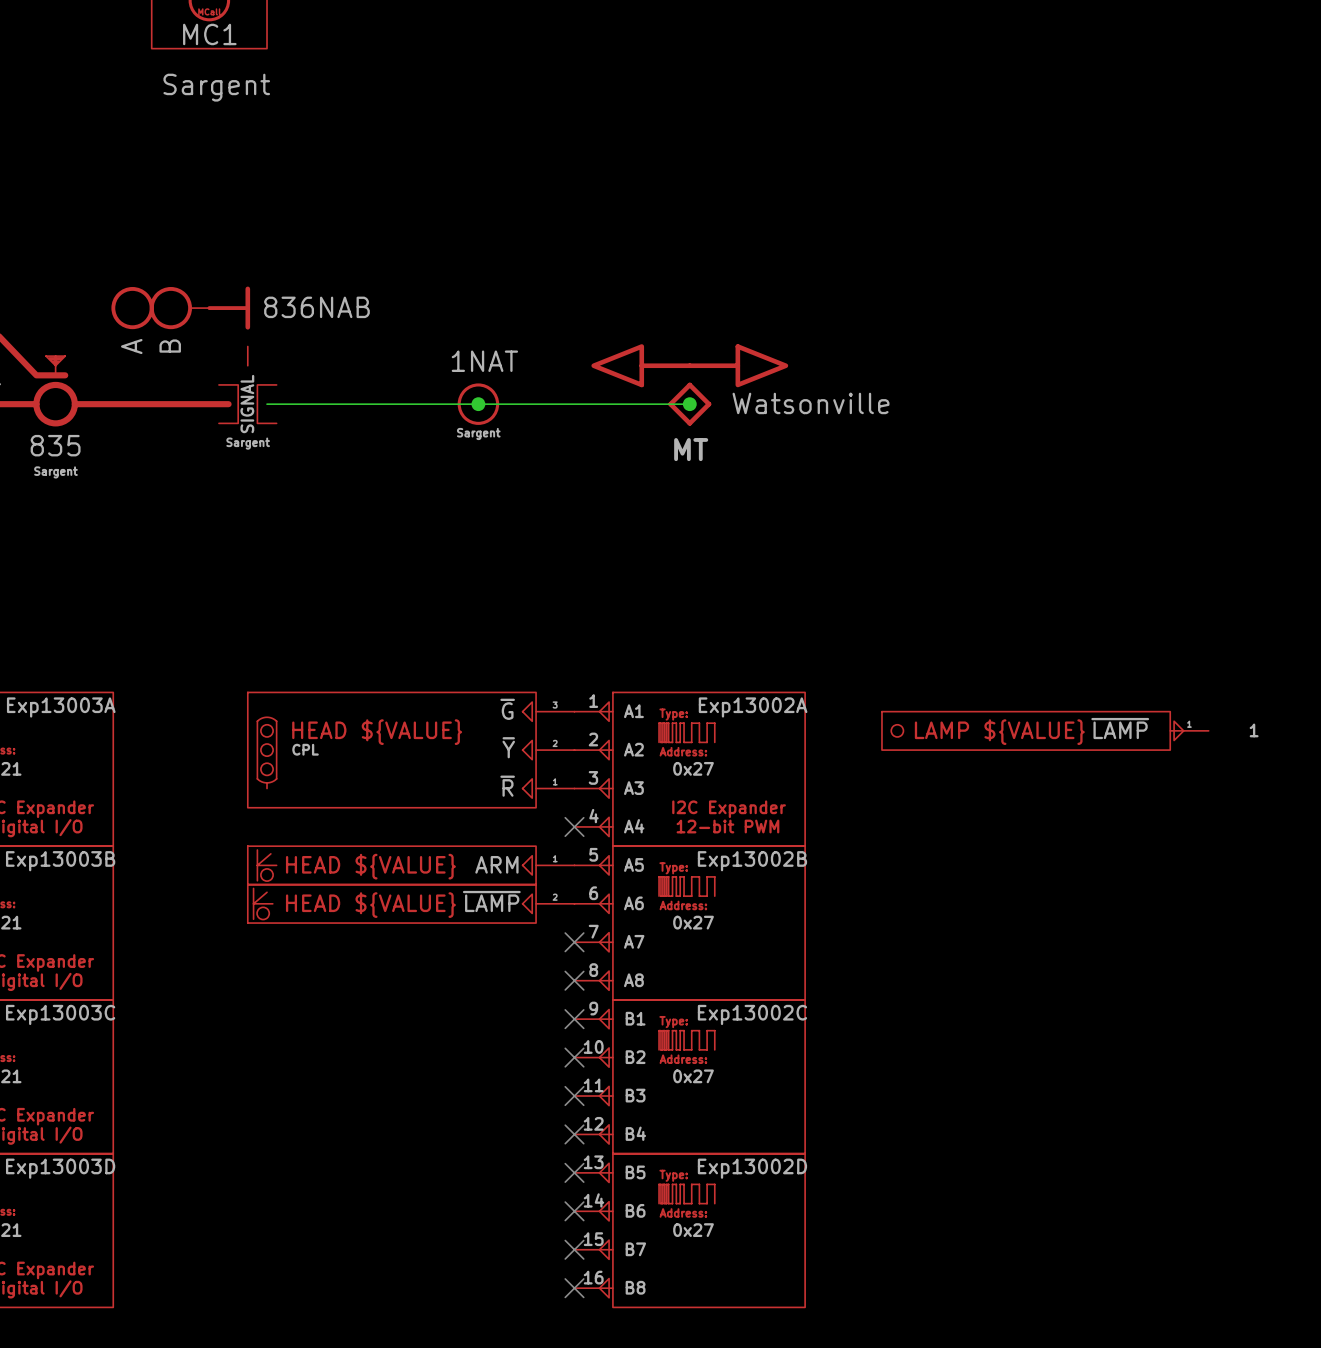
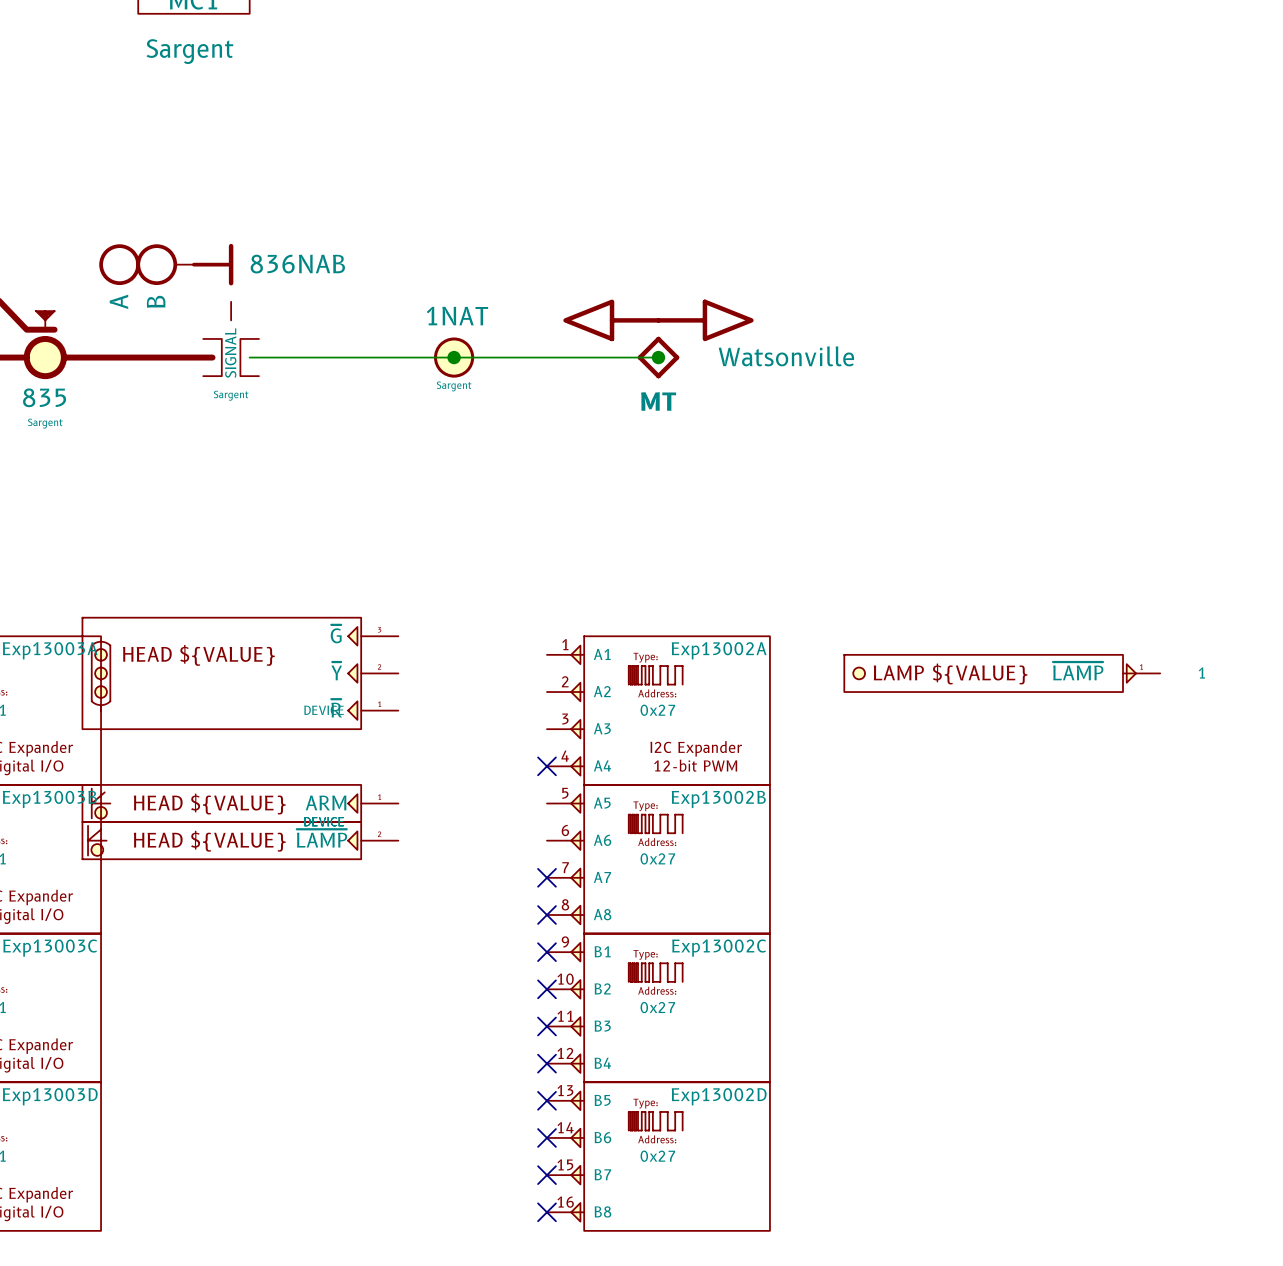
part: none -> (240, 673)
part: (411, 750) -> none
part: none -> (240, 803)
part: (411, 865) -> none
part: none -> (240, 840)
part: (411, 903) -> none

